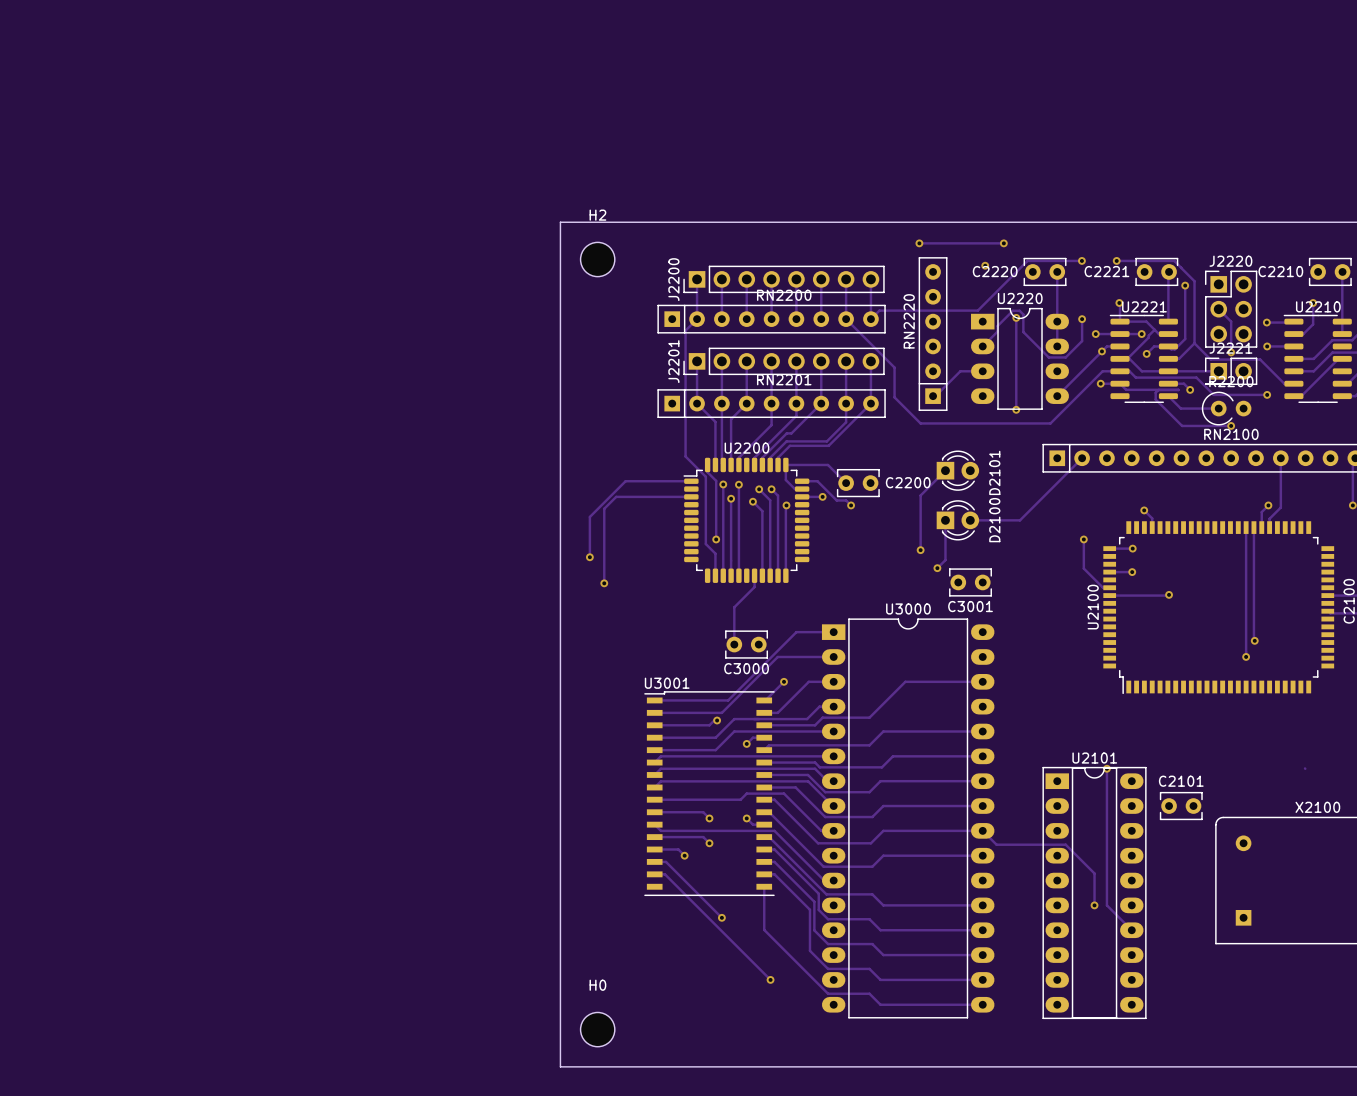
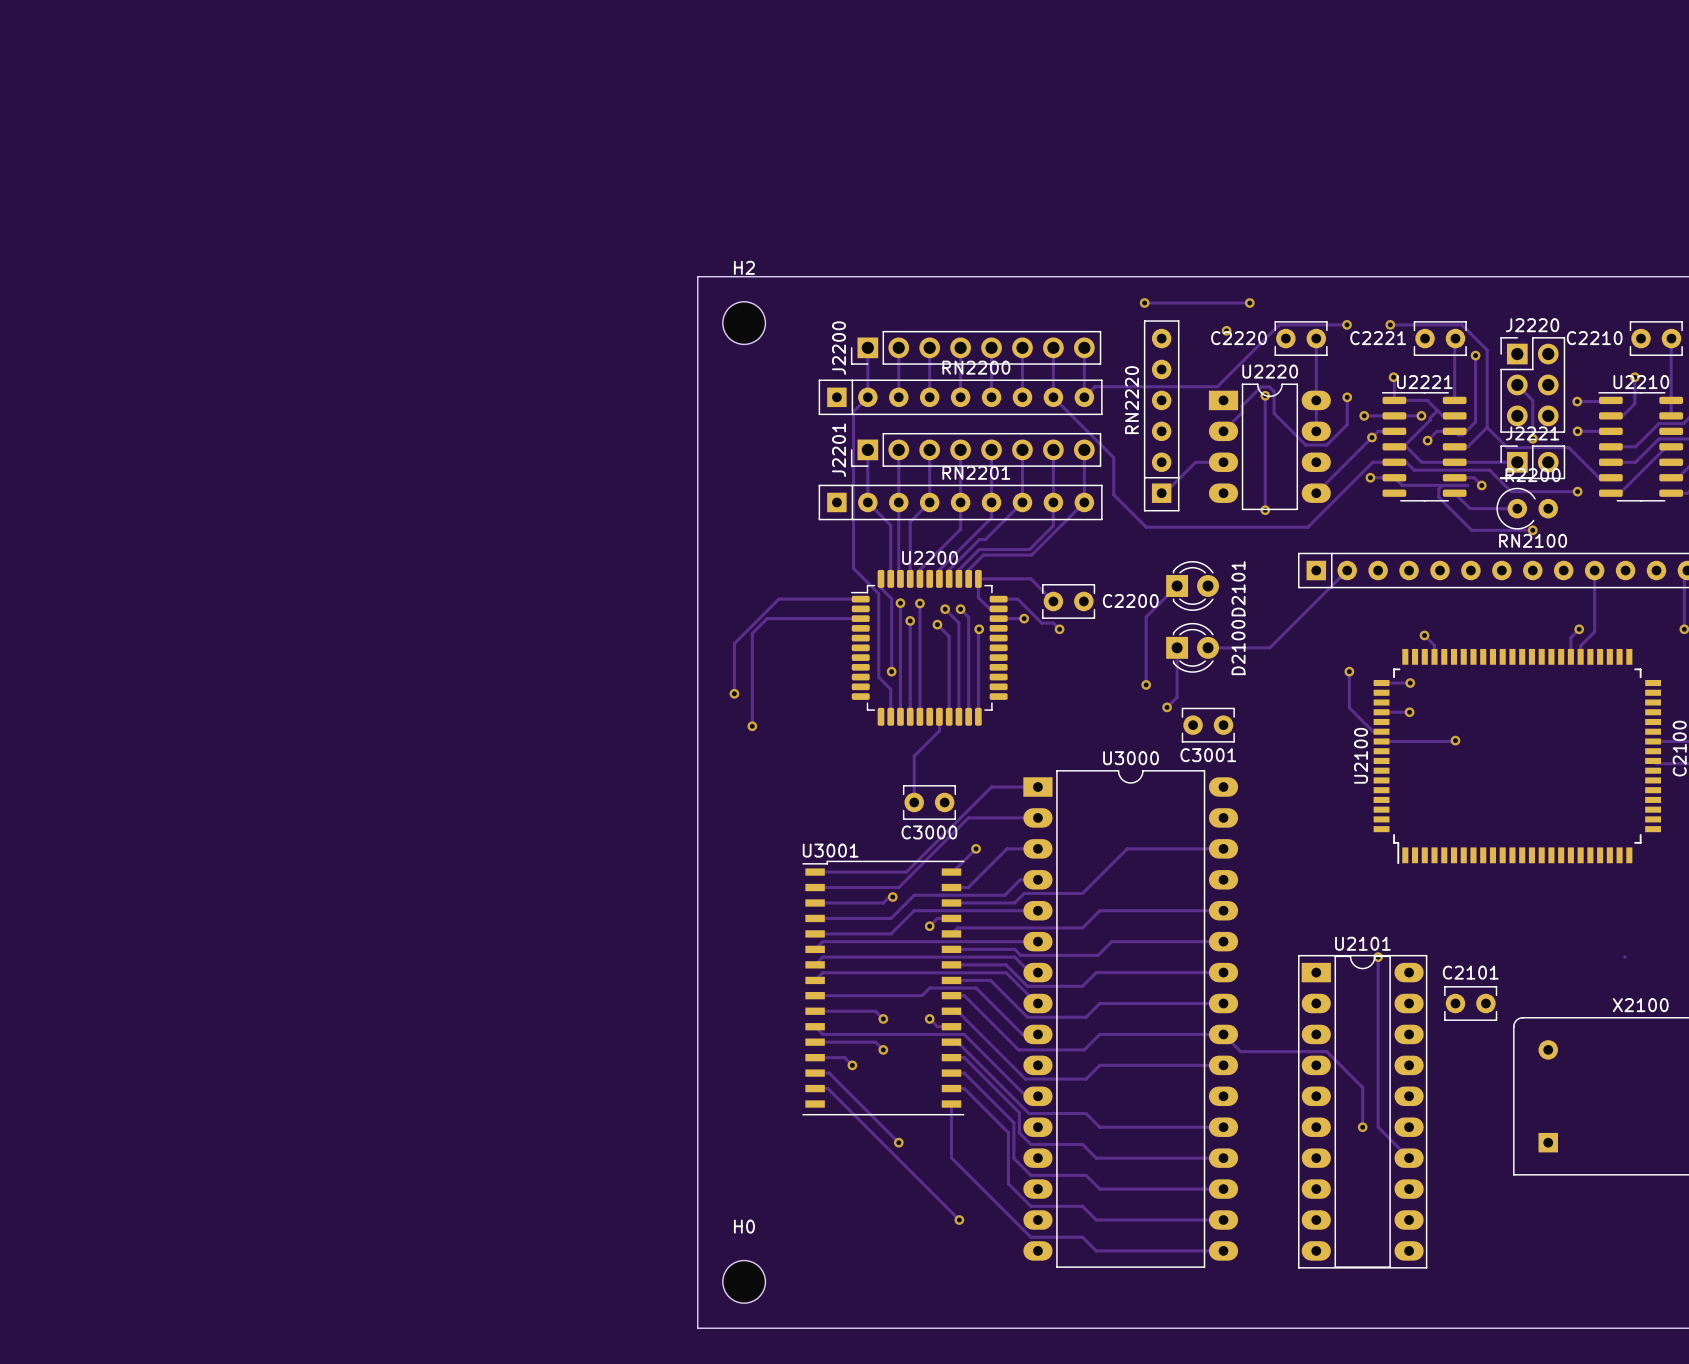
track: (1246, 527) (1246, 656) -> none
track: (1254, 527) (1254, 640) -> none
via: (1254, 640) -> none
via: (1246, 656) -> none

